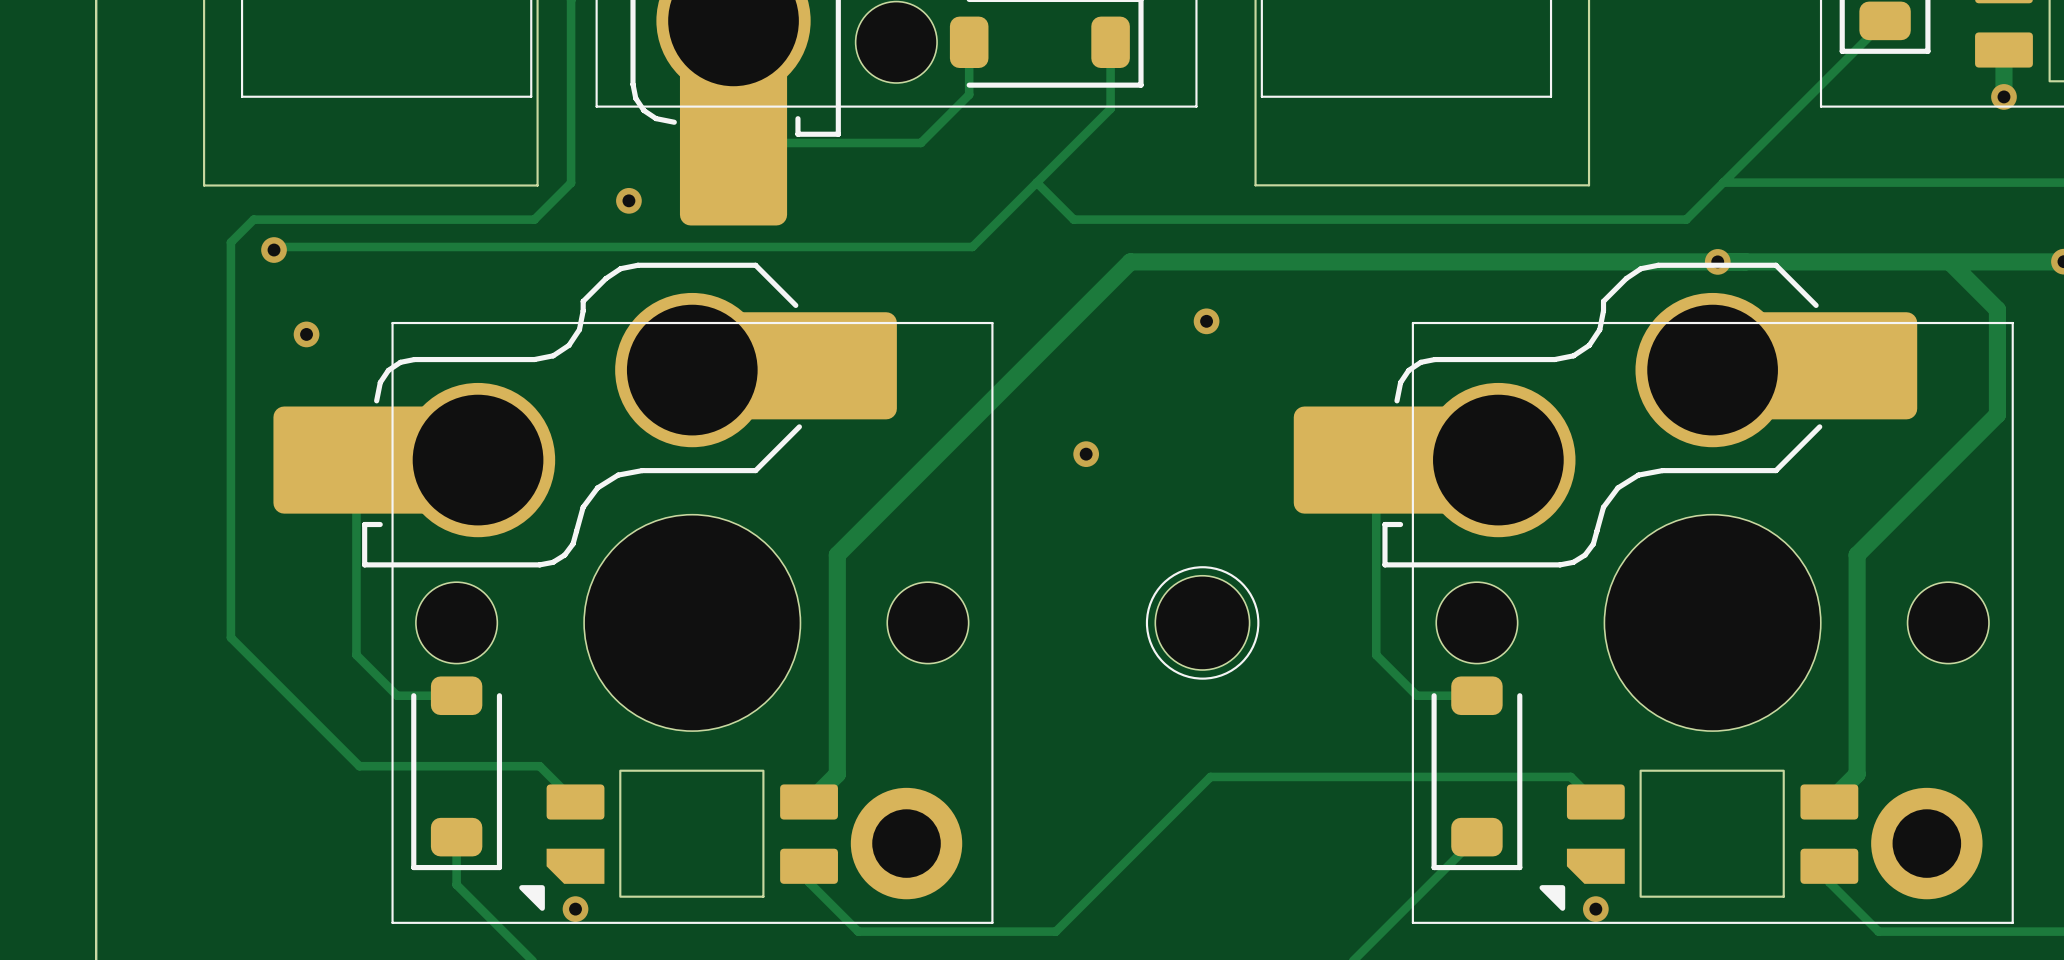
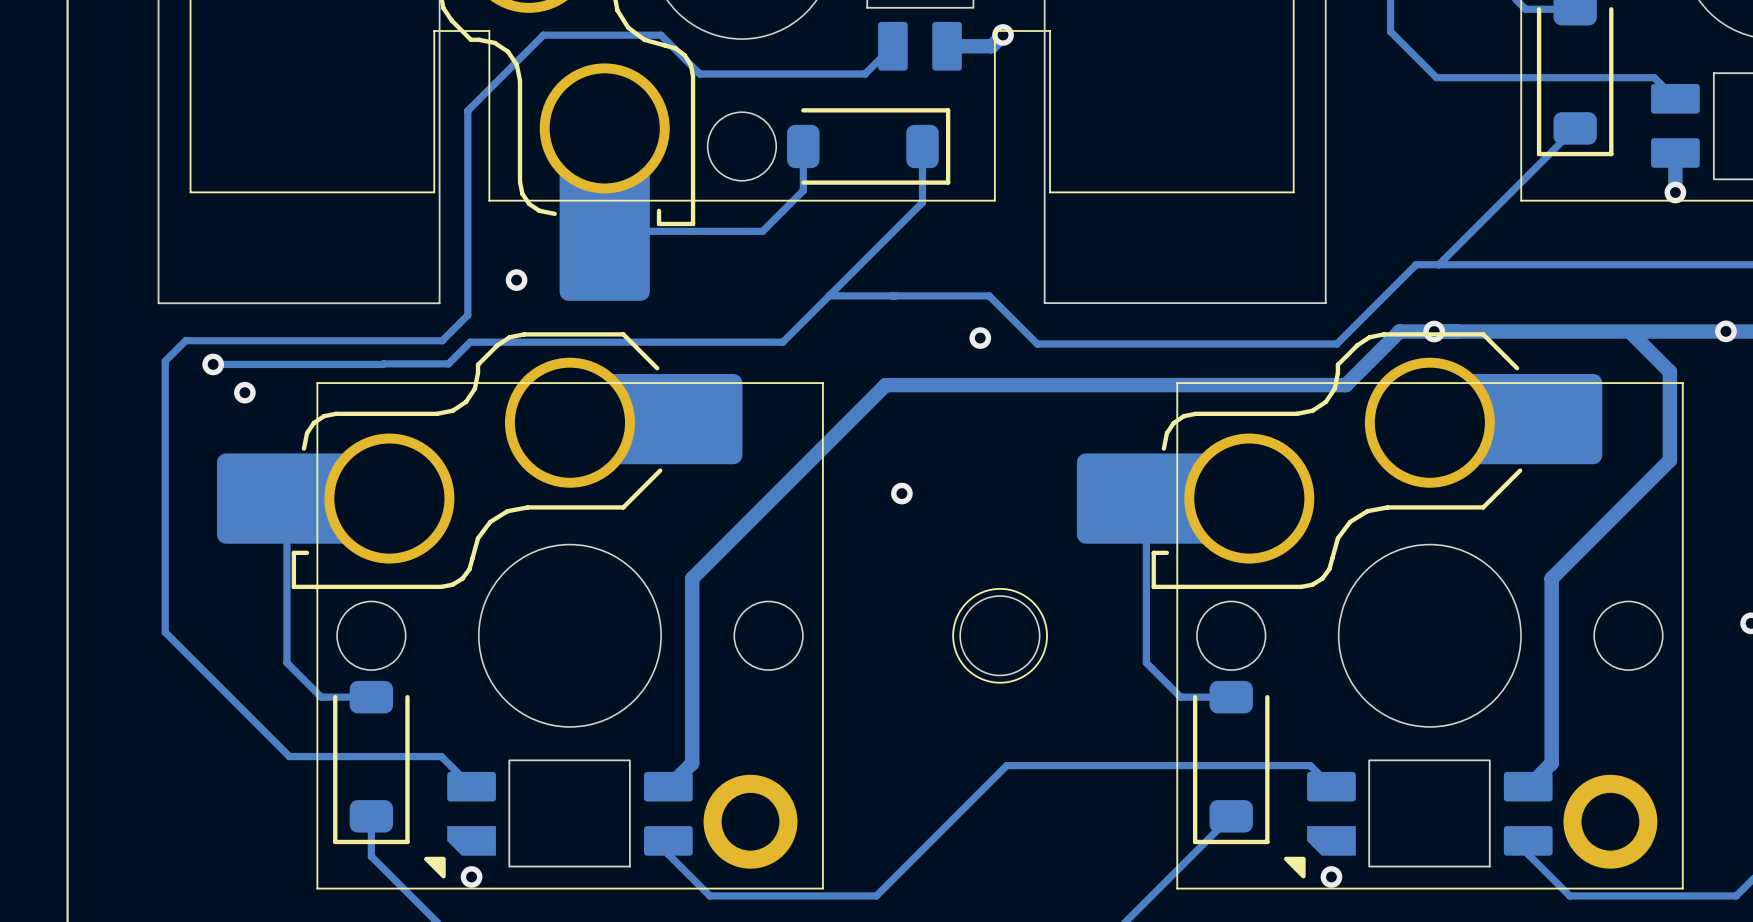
track: (571, 182) (534, 219) (253, 219) (230, 242) (230, 637) -> (467, 265) (467, 315) (442, 340) (185, 340) (165, 361) (165, 632) (181, 648)
track: (1036, 182) (1073, 219) -> (829, 295) (891, 295)
track: (1723, 182) (1686, 219) (1189, 219) -> (1438, 264) (1416, 264) (1336, 343) (1037, 343) (989, 295)
board edge: (537, 185) (204, 185) -> (439, 267) (439, 303) (158, 303) (158, 267)
board edge: (1589, 185) (1255, 185) -> (1325, 267) (1325, 303) (1044, 303) (1044, 267)
track: (972, 246) (283, 246) (280, 250) (274, 250) -> (806, 318) (782, 342) (470, 342) (448, 363) (213, 364)
via position: (274, 250) -> (213, 364)
track: (1676, 261) (1130, 261) (1066, 325) -> (1399, 331) (1345, 385) (885, 385)
via position: (1206, 321) -> (980, 338)

